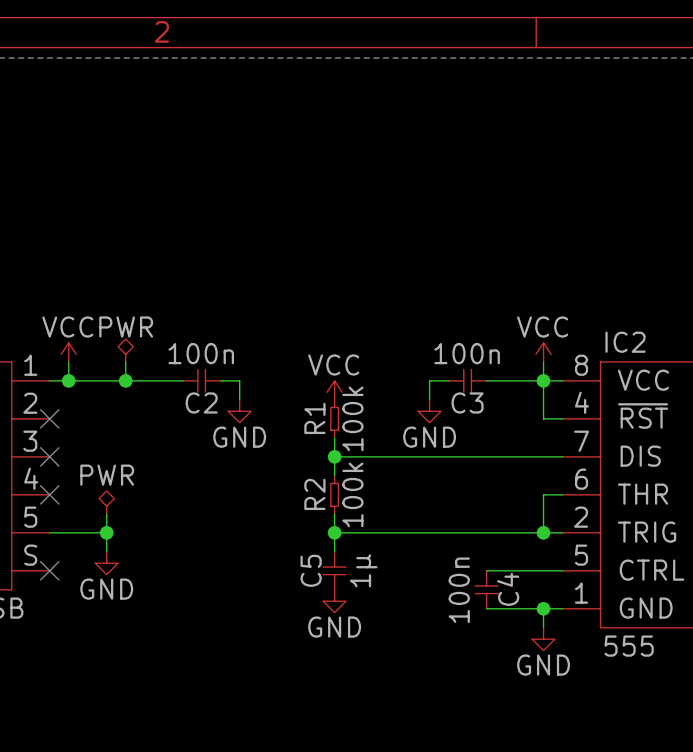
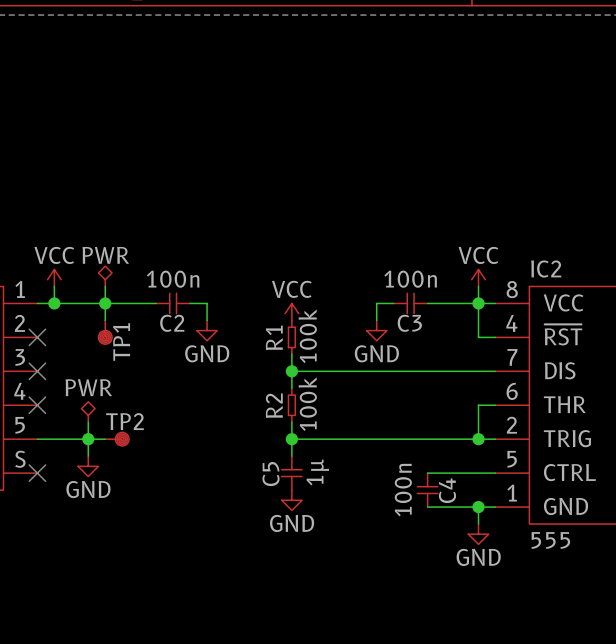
wire: none -> (105, 303) (105, 320)
TP1: none -> (105, 332)
wire: none -> (88, 439) (105, 439)
TP2: none -> (117, 439)

